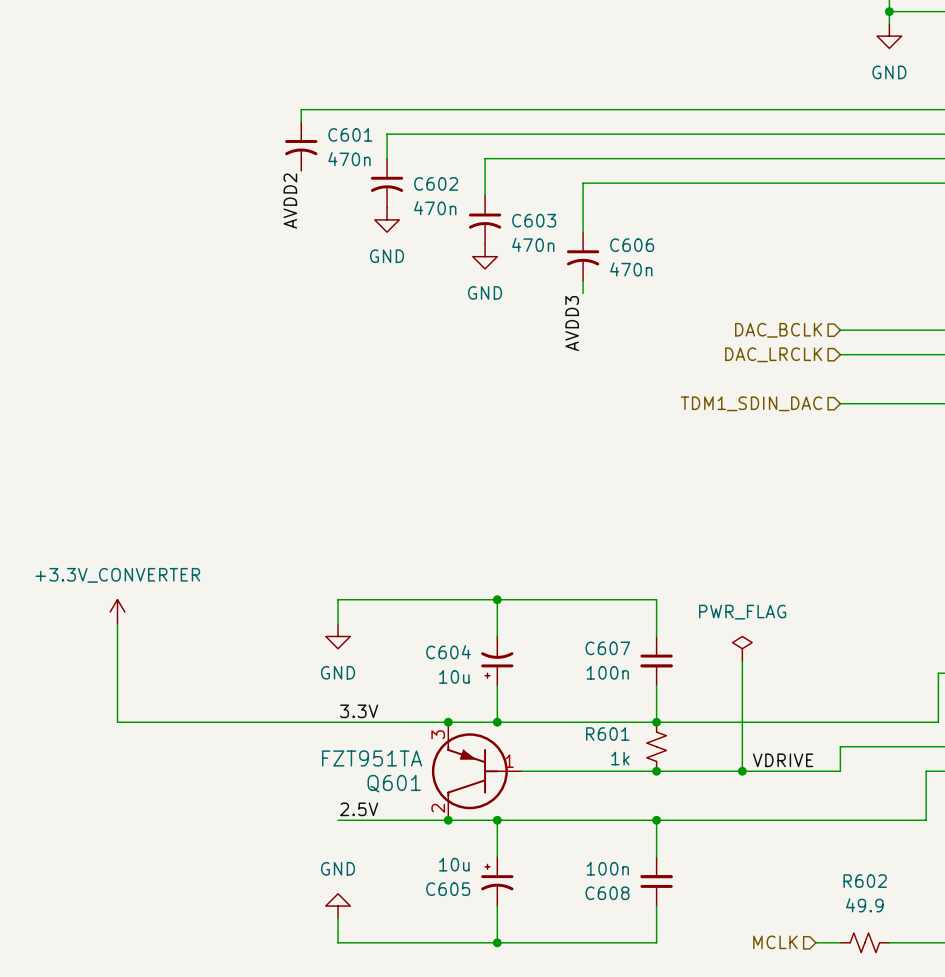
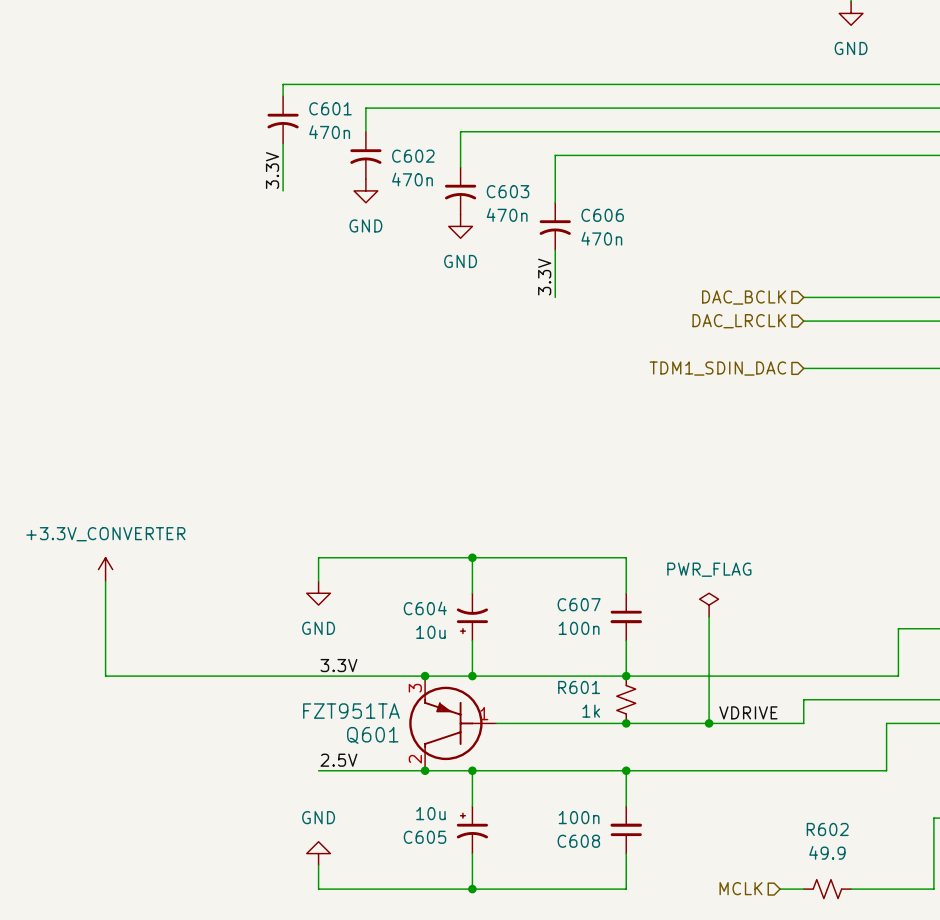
wire: none -> (283, 143) (283, 190)
label: none -> 3.3V (272, 170)
label: AVDD2 (290, 201) -> none
wire: none -> (555, 261) (555, 297)
label: none -> 3.3V (544, 277)
label: AVDD3 (572, 323) -> none

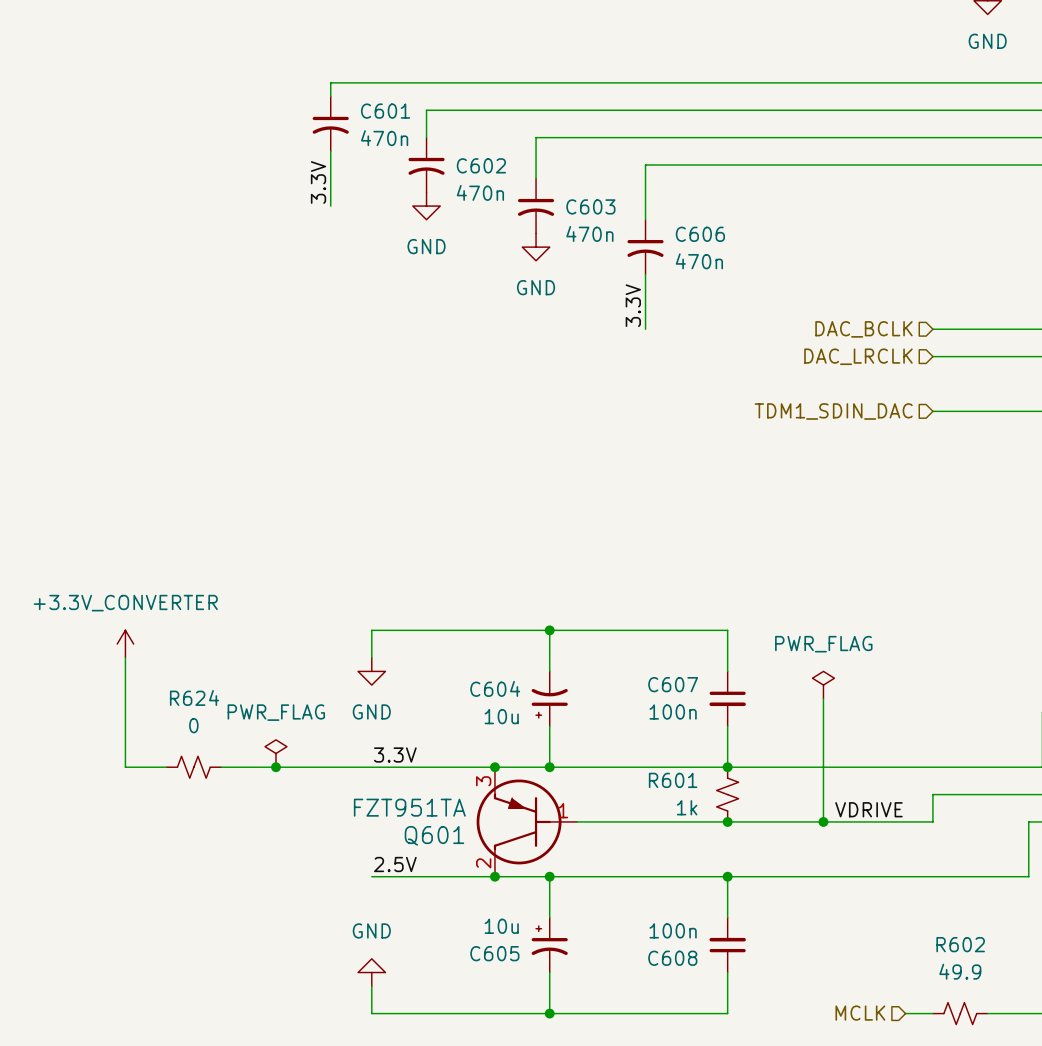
power symbol: none -> PWR_FLAG (275, 753)
R624: none -> 0 (193, 767)
junction: none -> (275, 767)

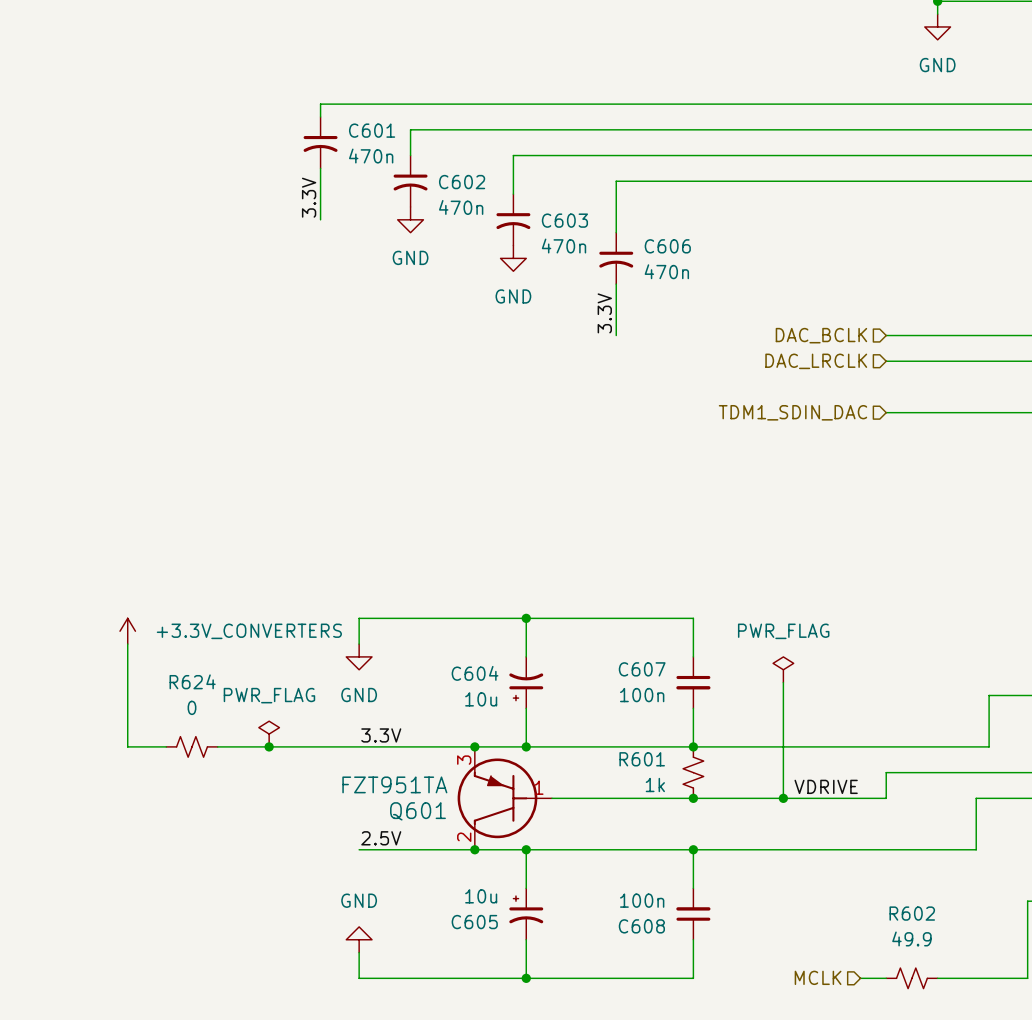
power symbol: +3.3V_CONVERTER (125, 644) -> +3.3V_CONVERTERS (127, 631)

